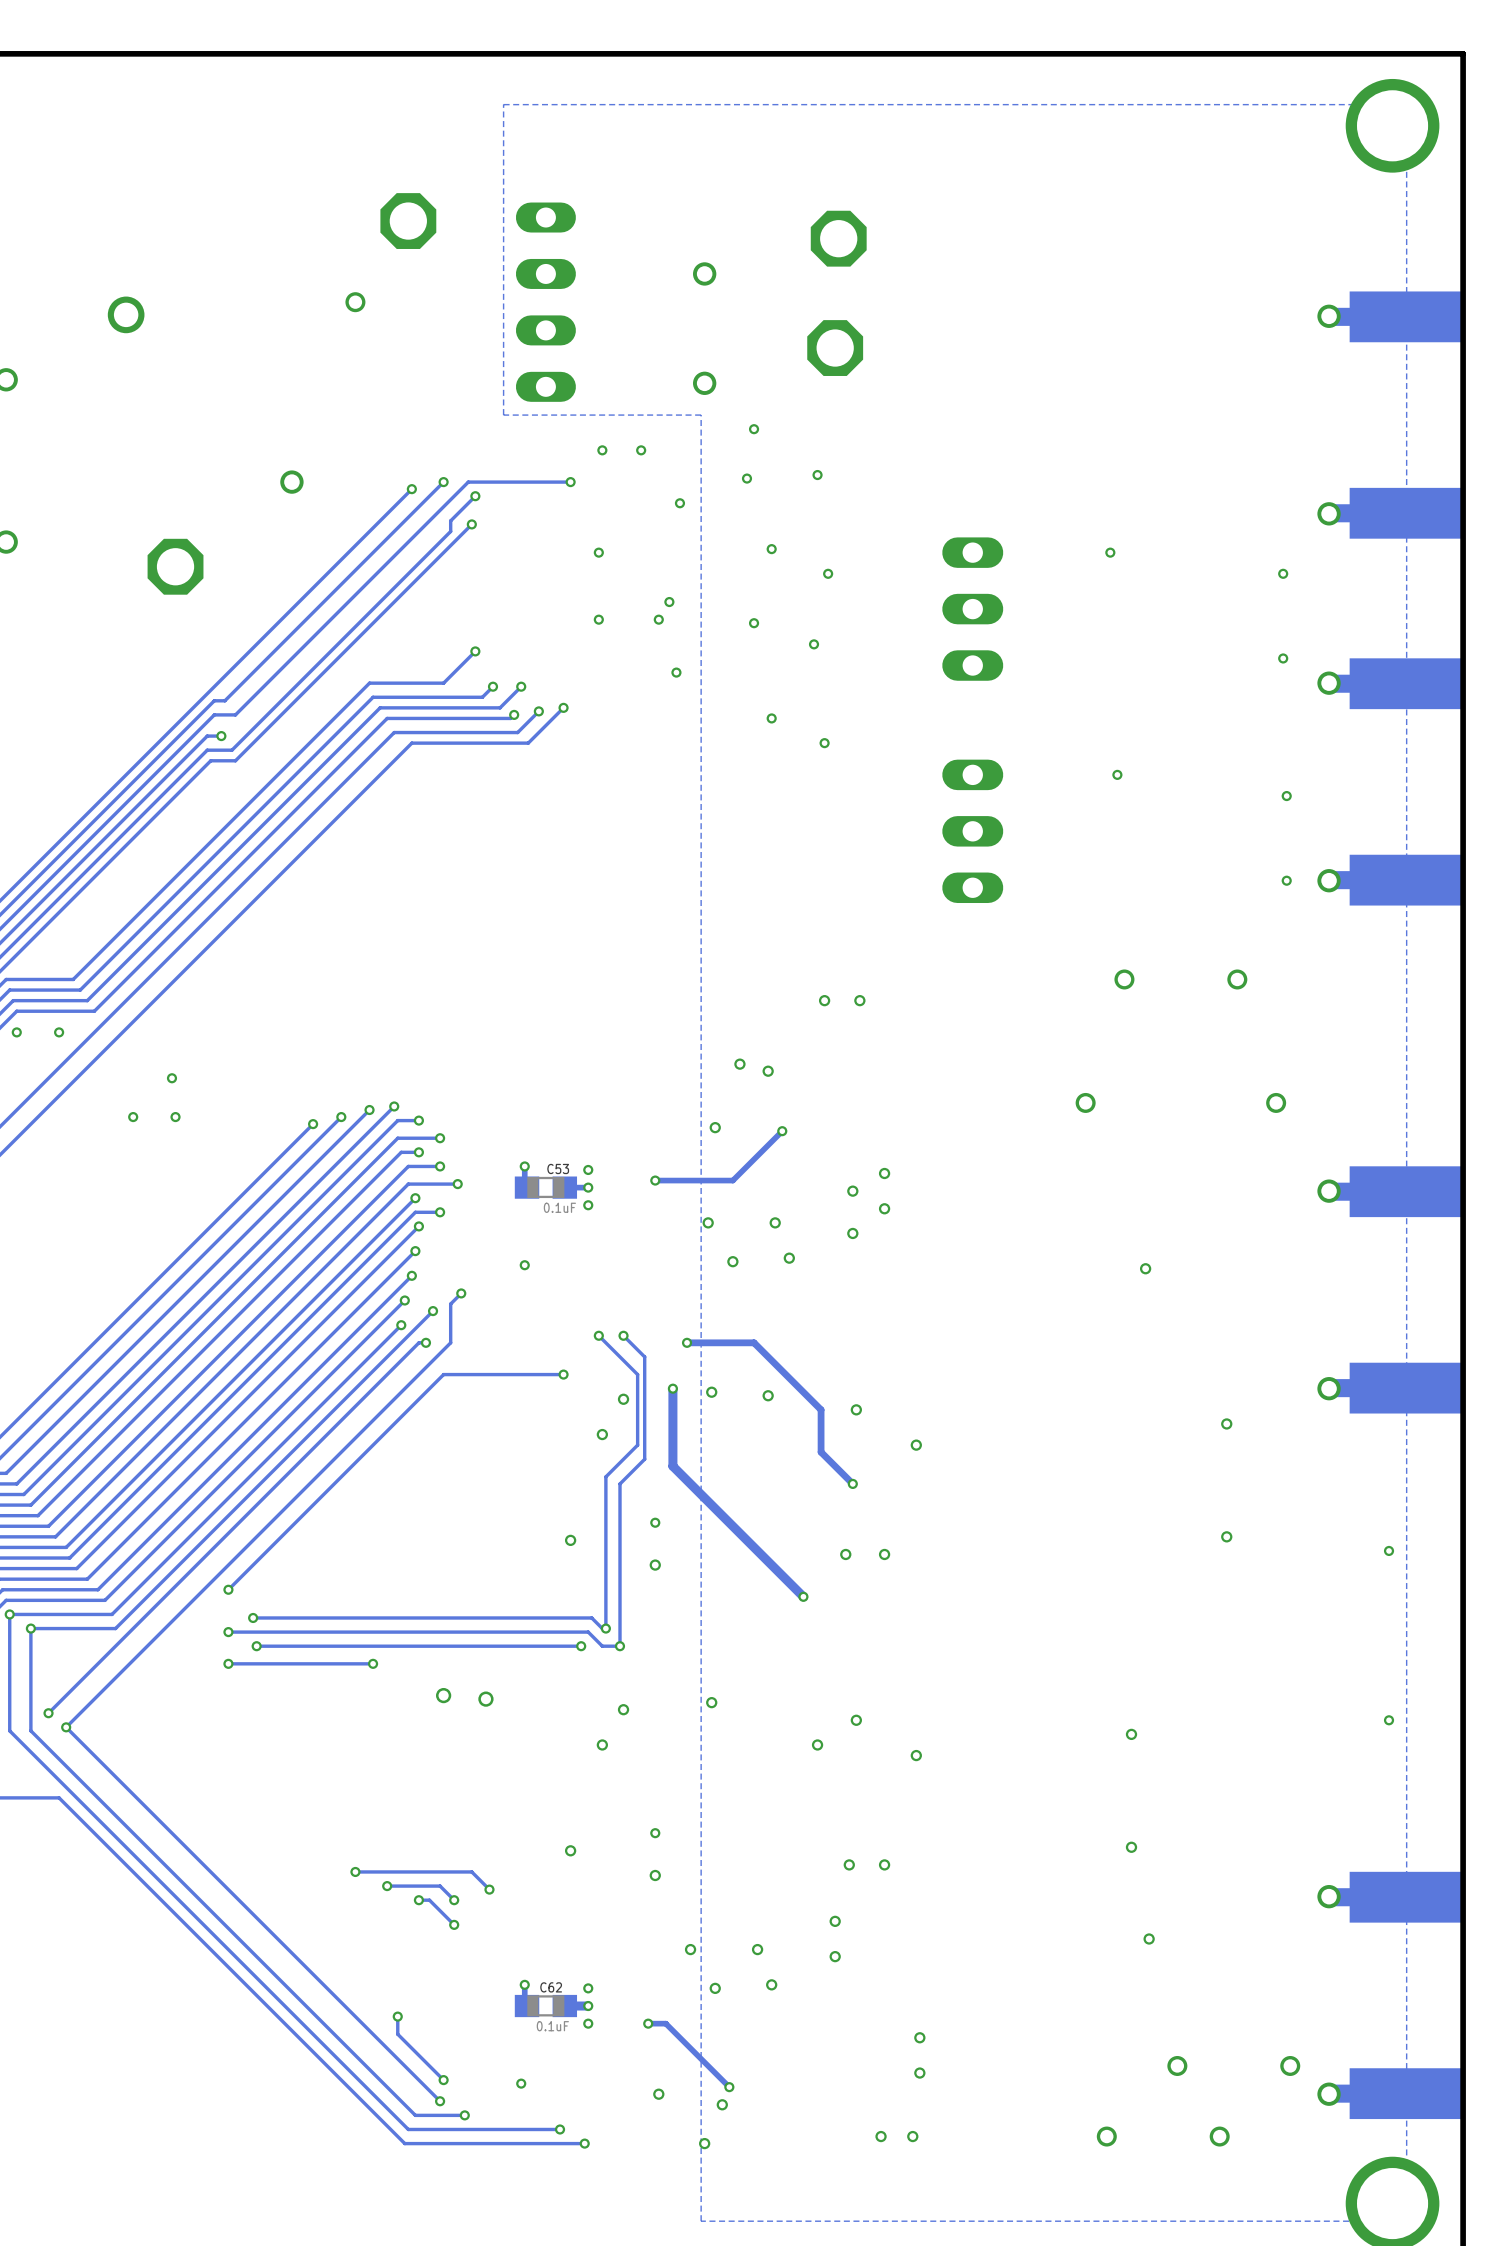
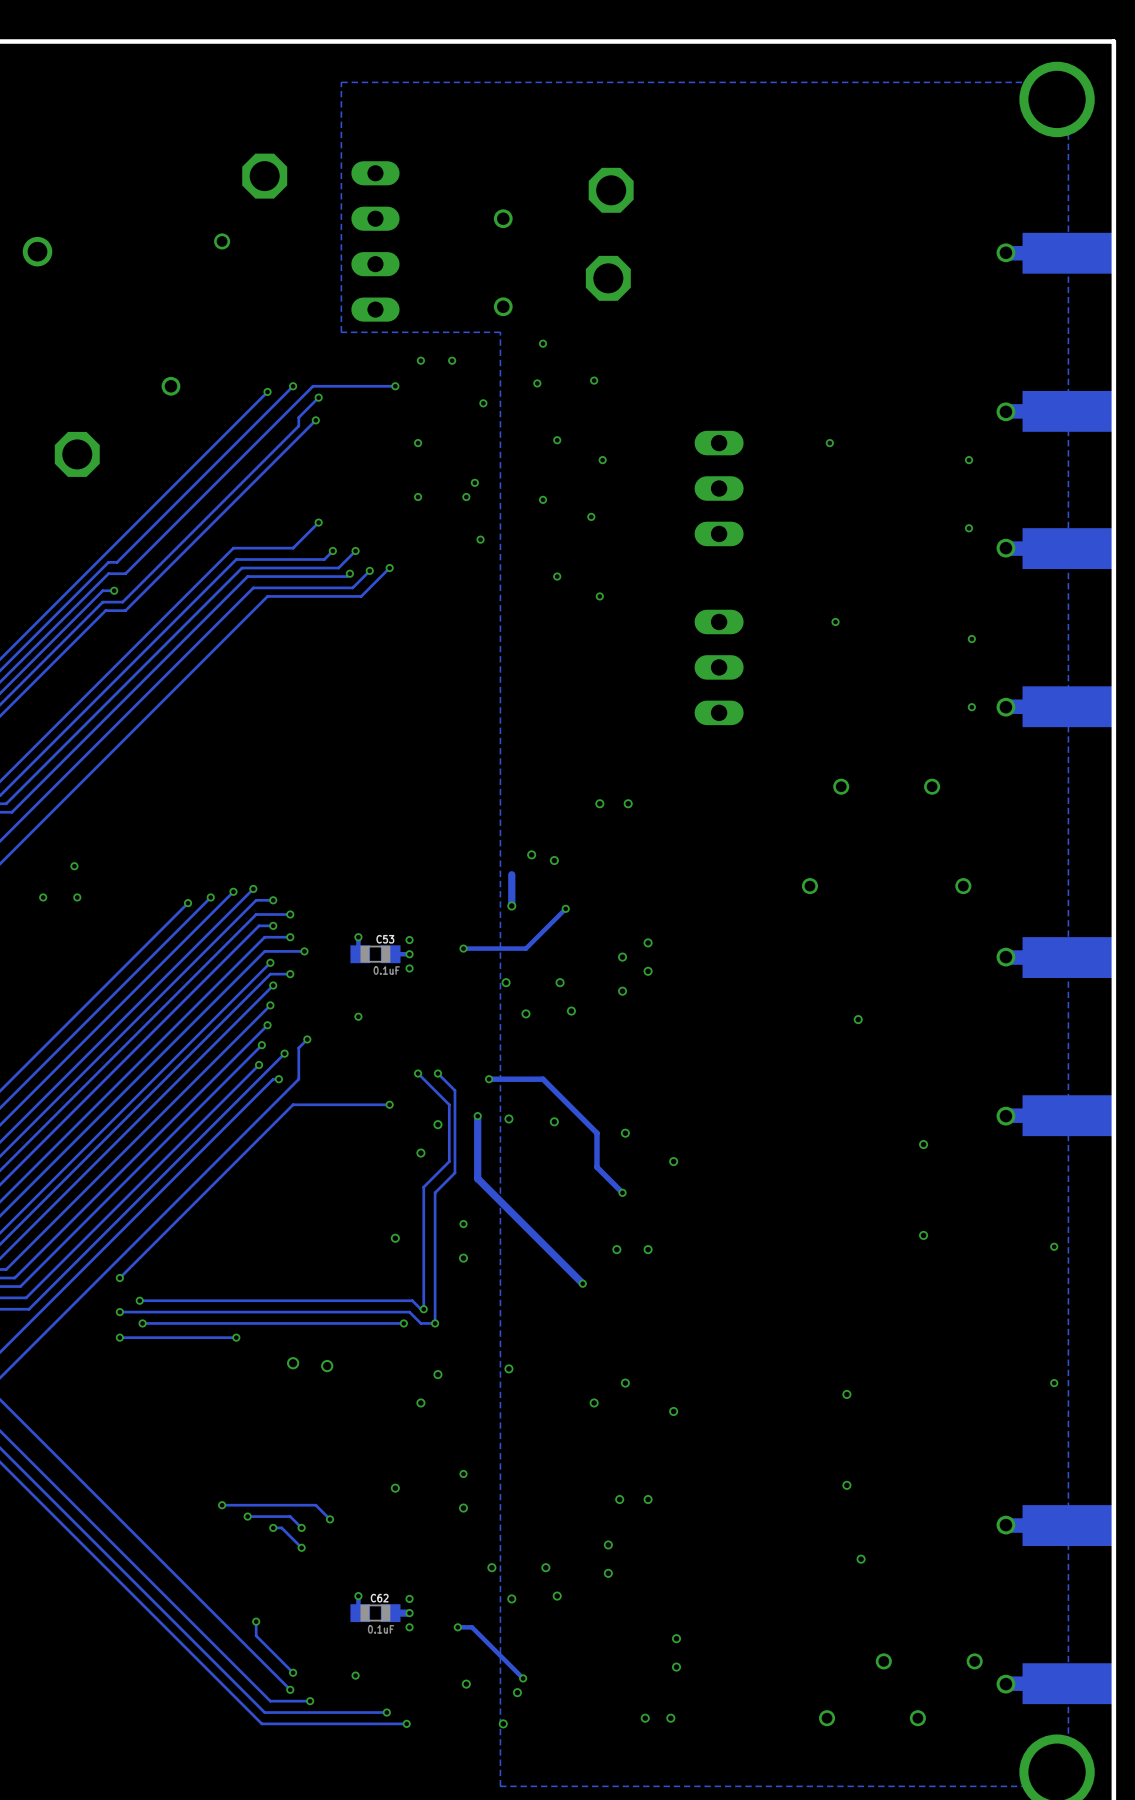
track: none -> (511, 874) (511, 905)

